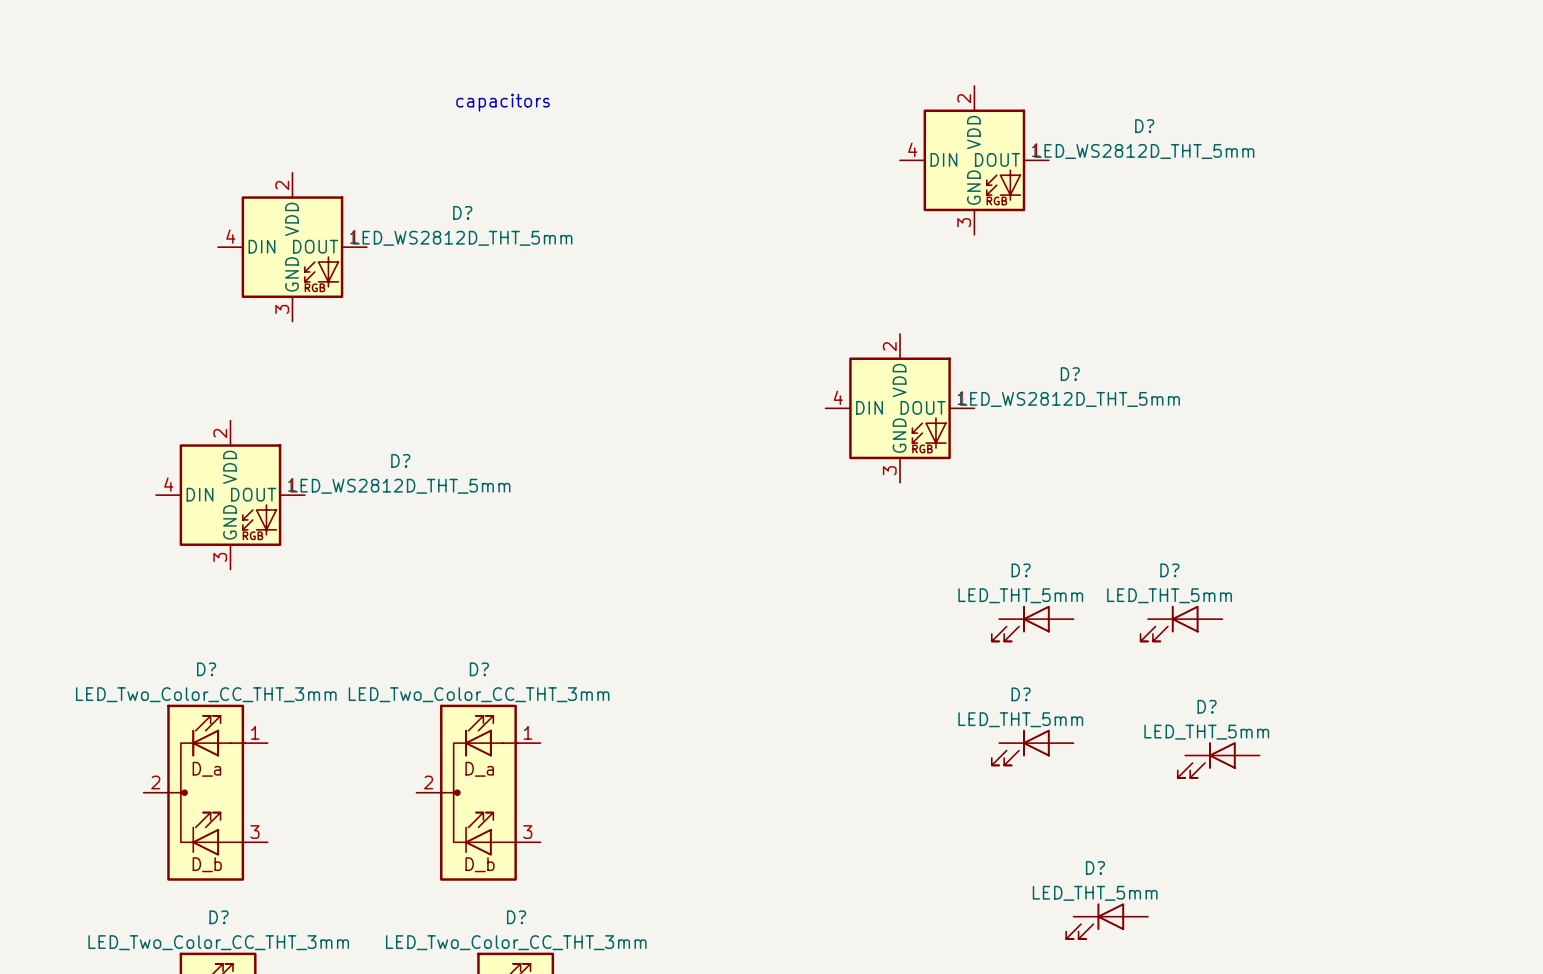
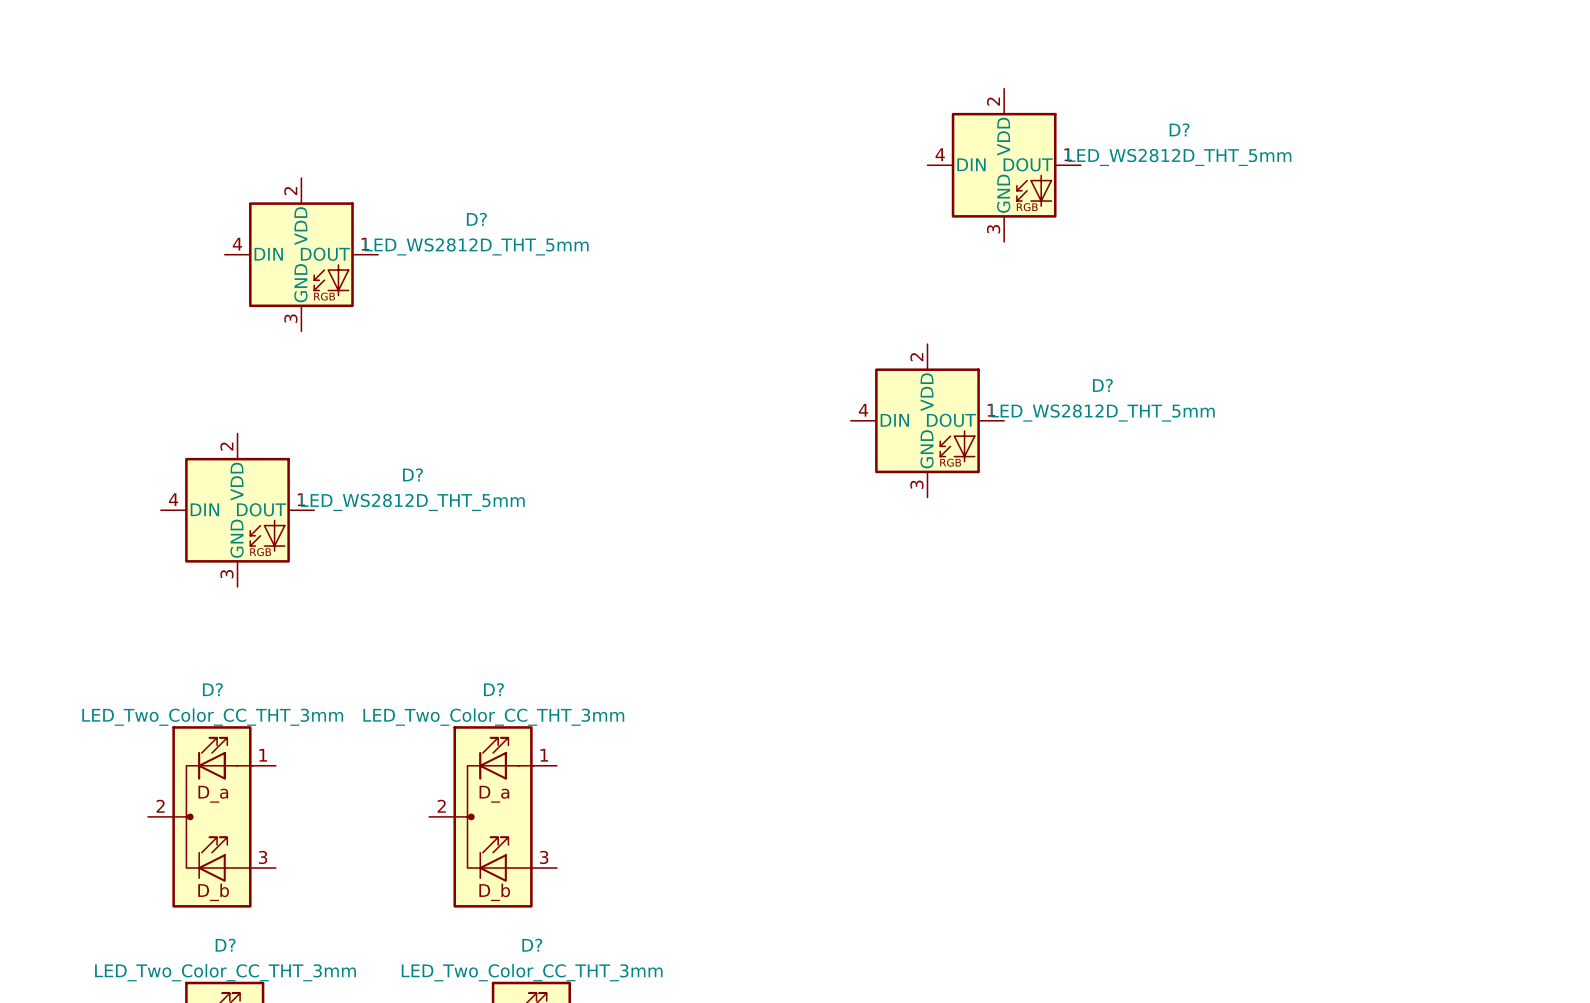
text: capacitors (503, 102) -> none
D?: LED_THT_5mm (1032, 623) -> none
D?: LED_THT_5mm (1181, 623) -> none
D?: LED_THT_5mm (1032, 747) -> none
D?: LED_THT_5mm (1218, 759) -> none
D?: LED_THT_5mm (1107, 921) -> none

